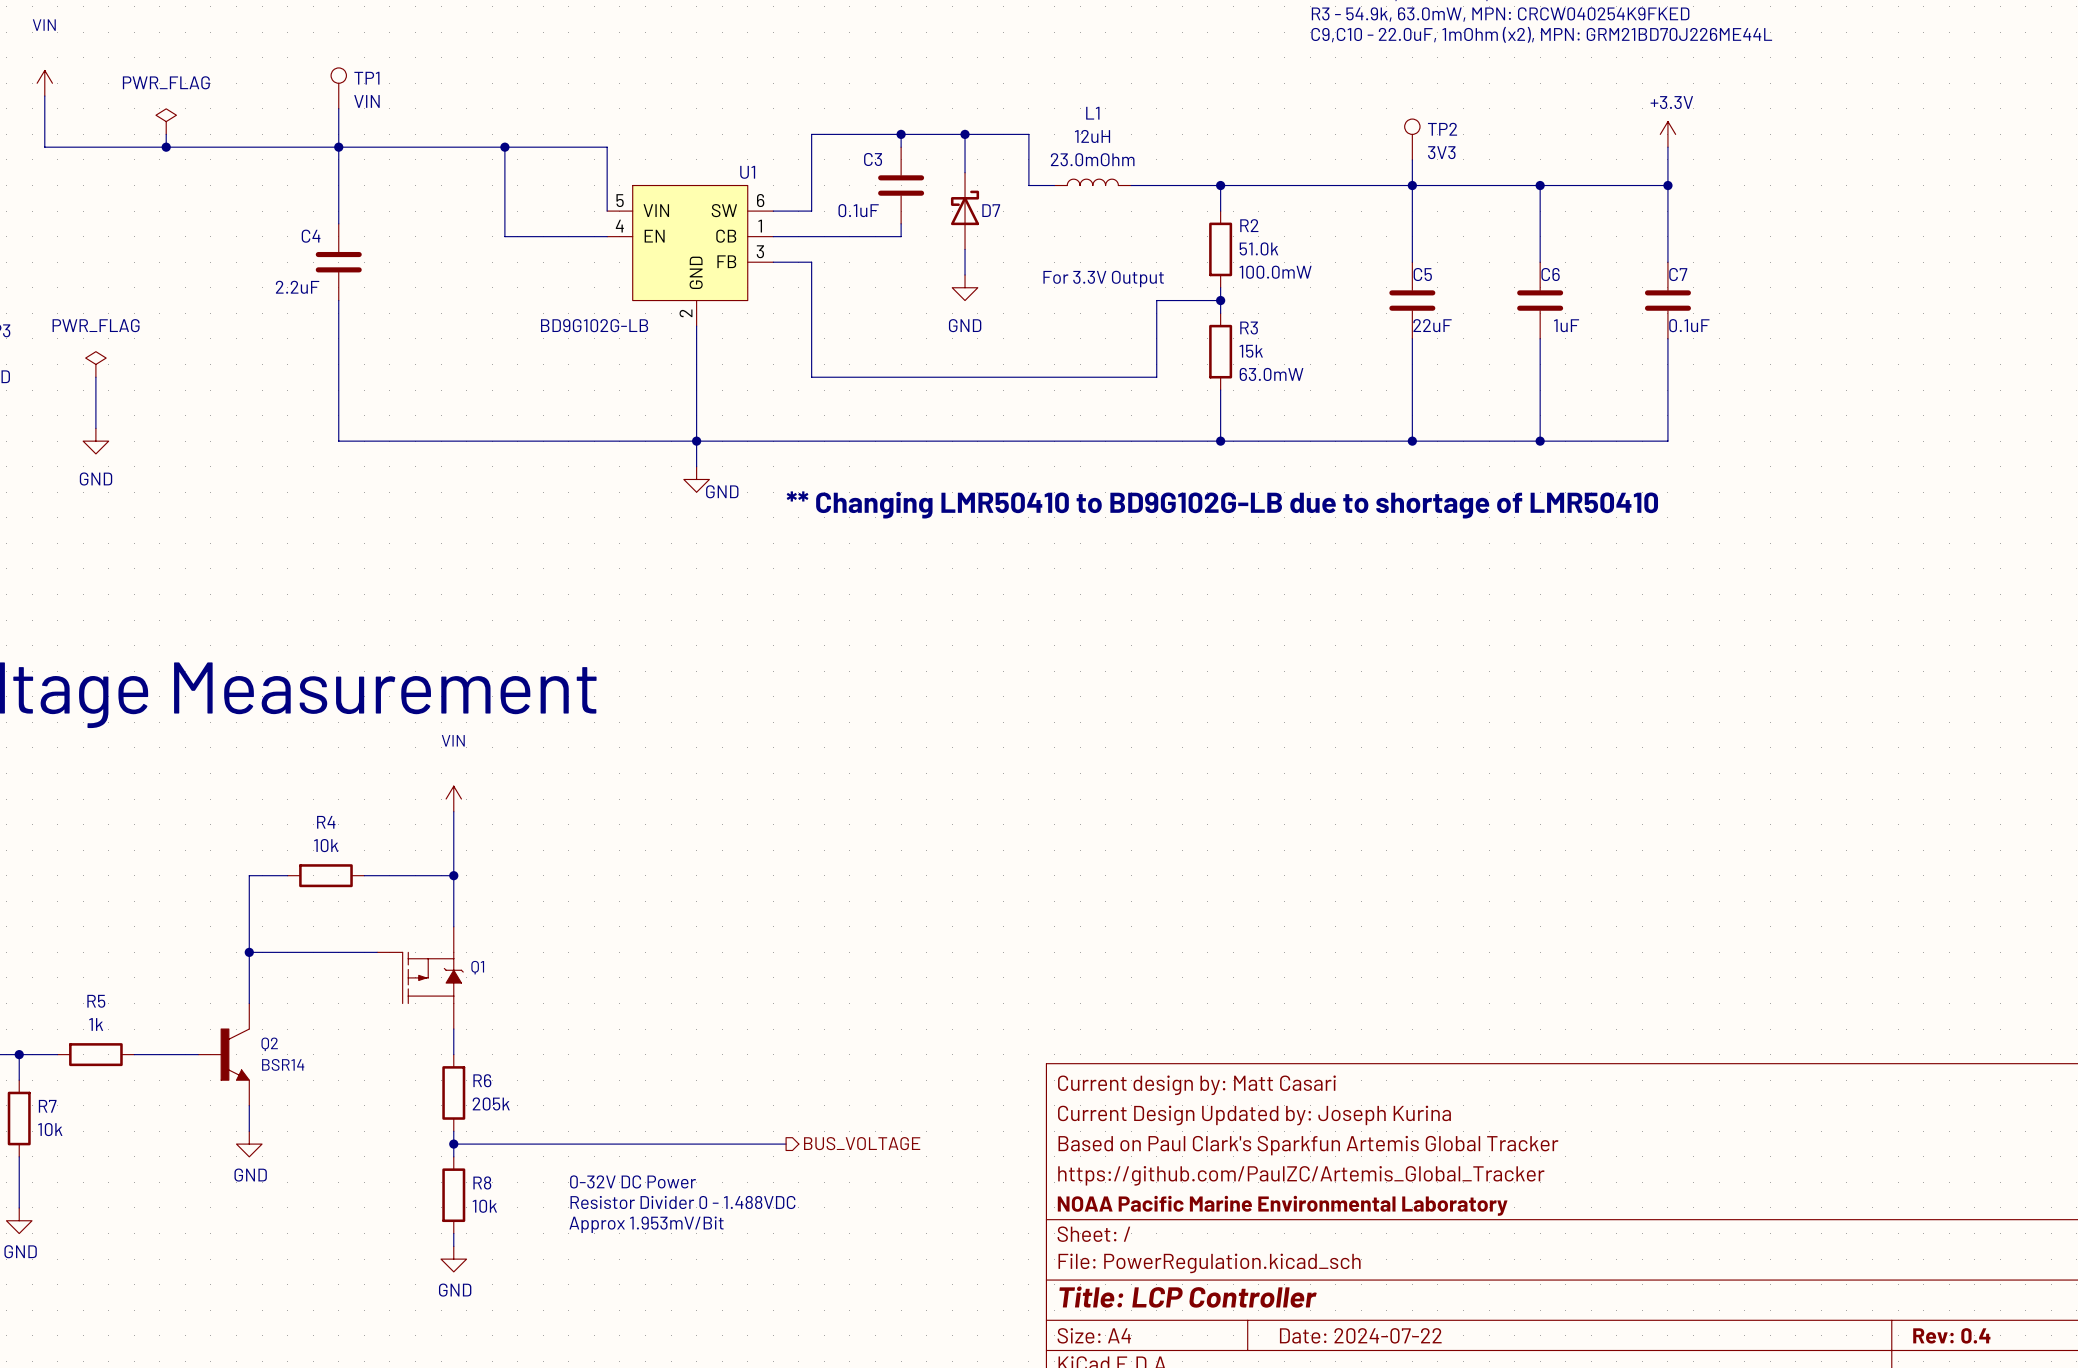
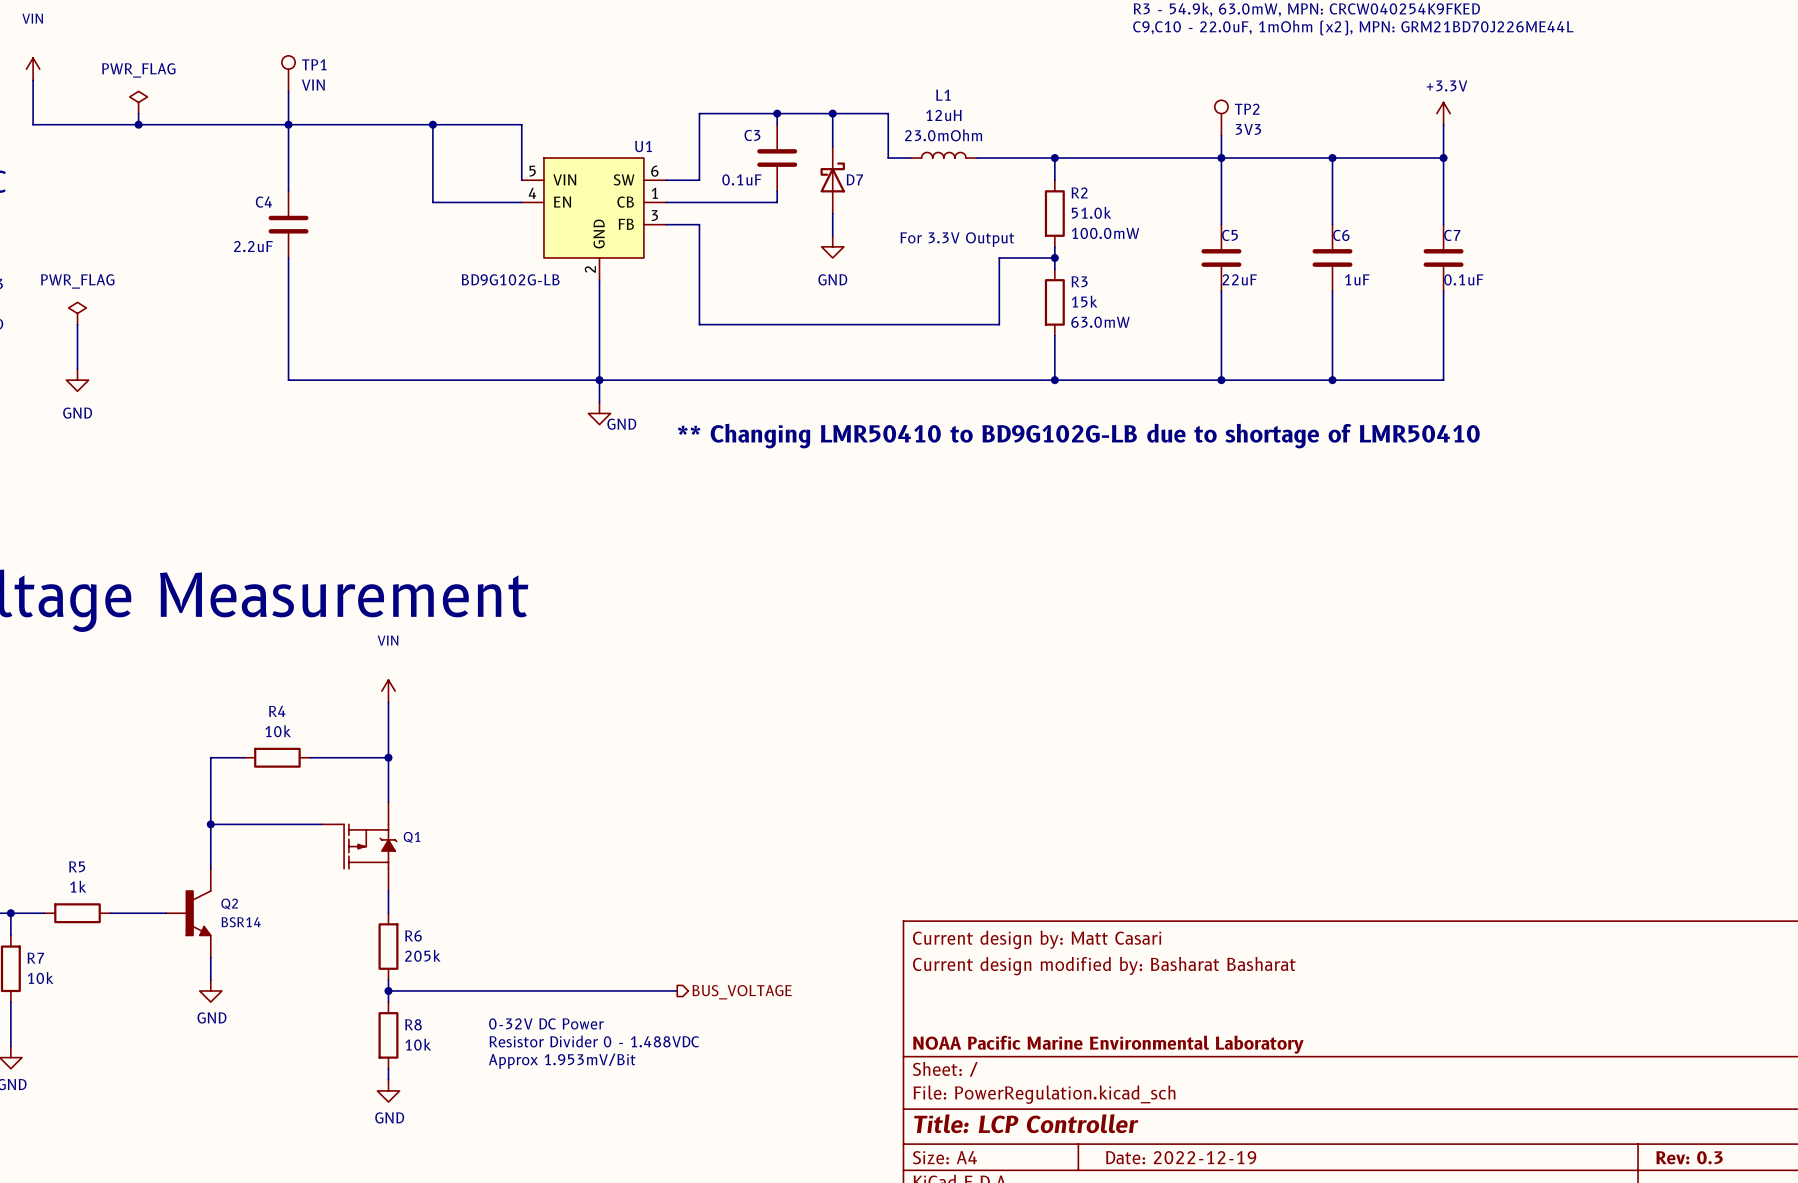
title block: Current Design Updated by: Joseph Kurina (1254, 1115) -> Current design modified by: Basharat Basharat (1104, 966)
title block: Based on Paul Clark's Sparkfun Artemis Global Tracker (1308, 1145) -> none
title block: https://github.com/PaulZC/Artemis_Global_Tracker (1301, 1175) -> none
title block: Date: 2024-07-22 (1360, 1335) -> Date: 2022-12-19 (1181, 1157)
title block: Rev: 0.4 (1951, 1335) -> Rev: 0.3 (1689, 1157)

